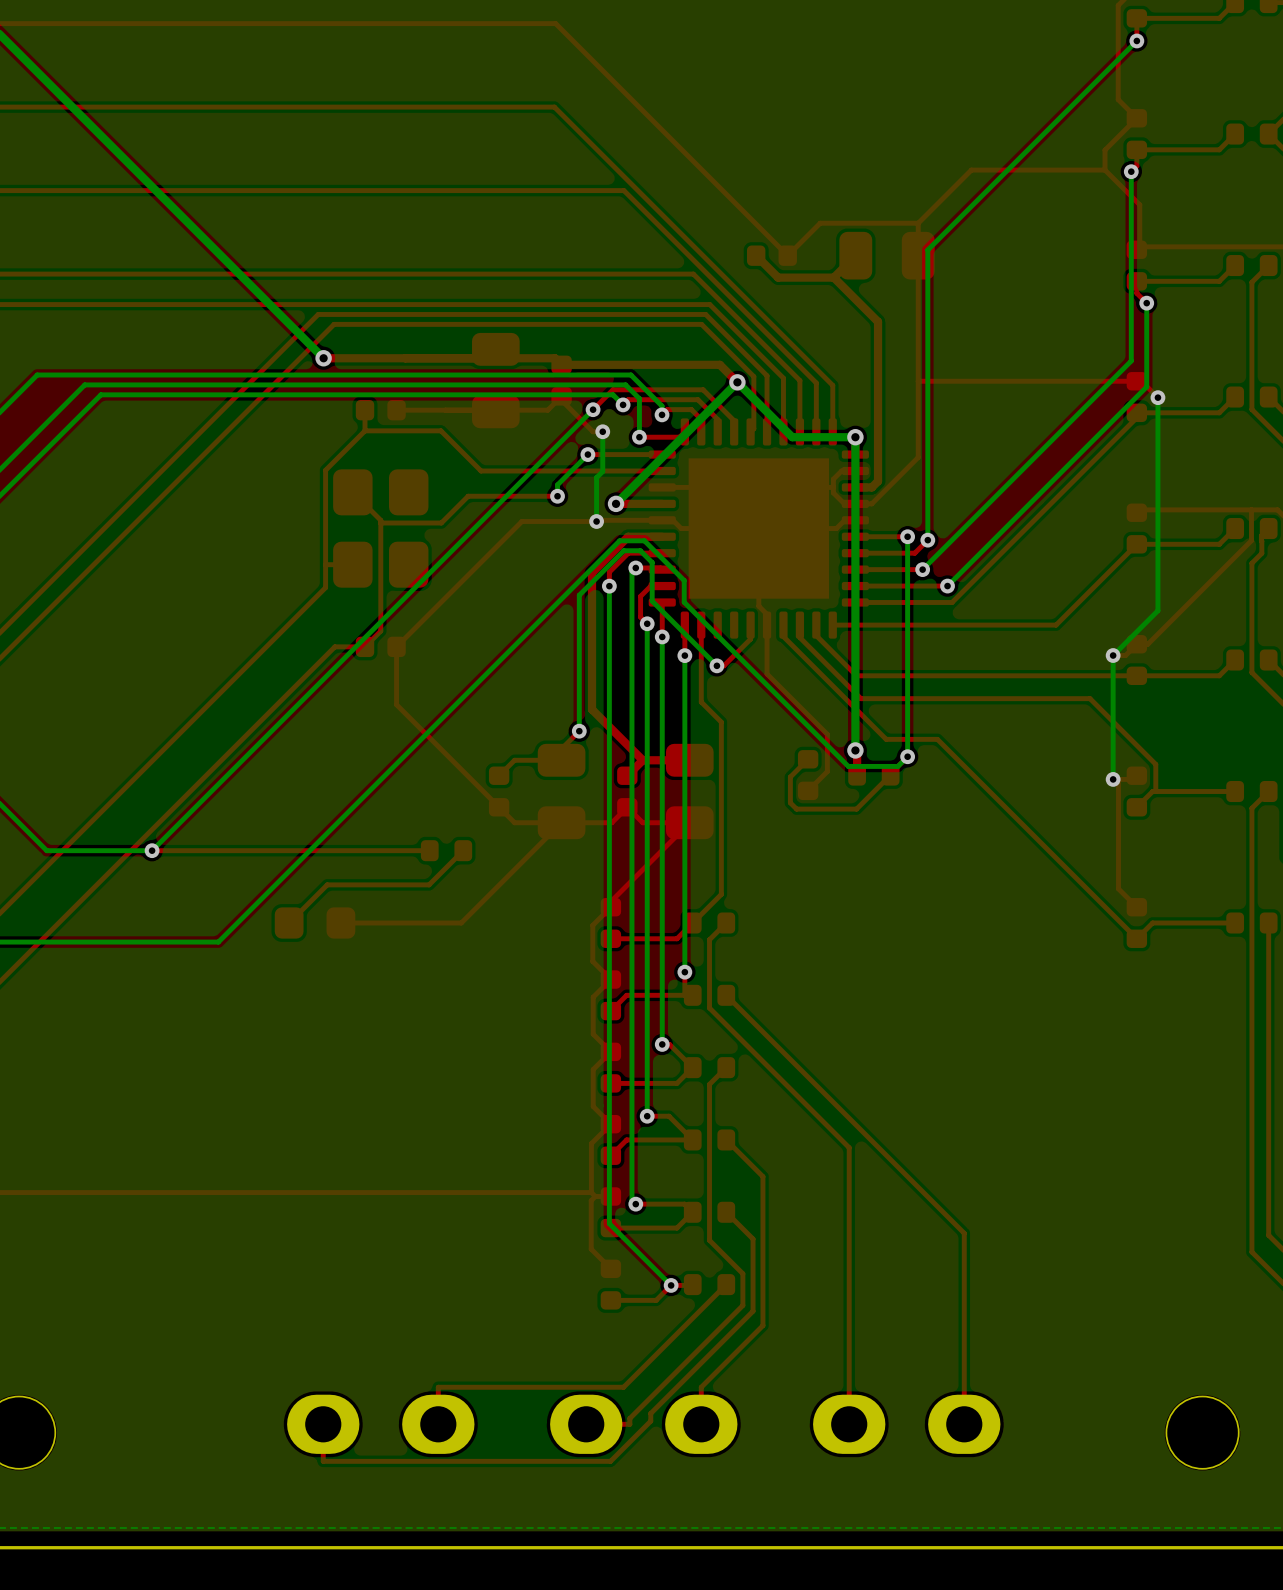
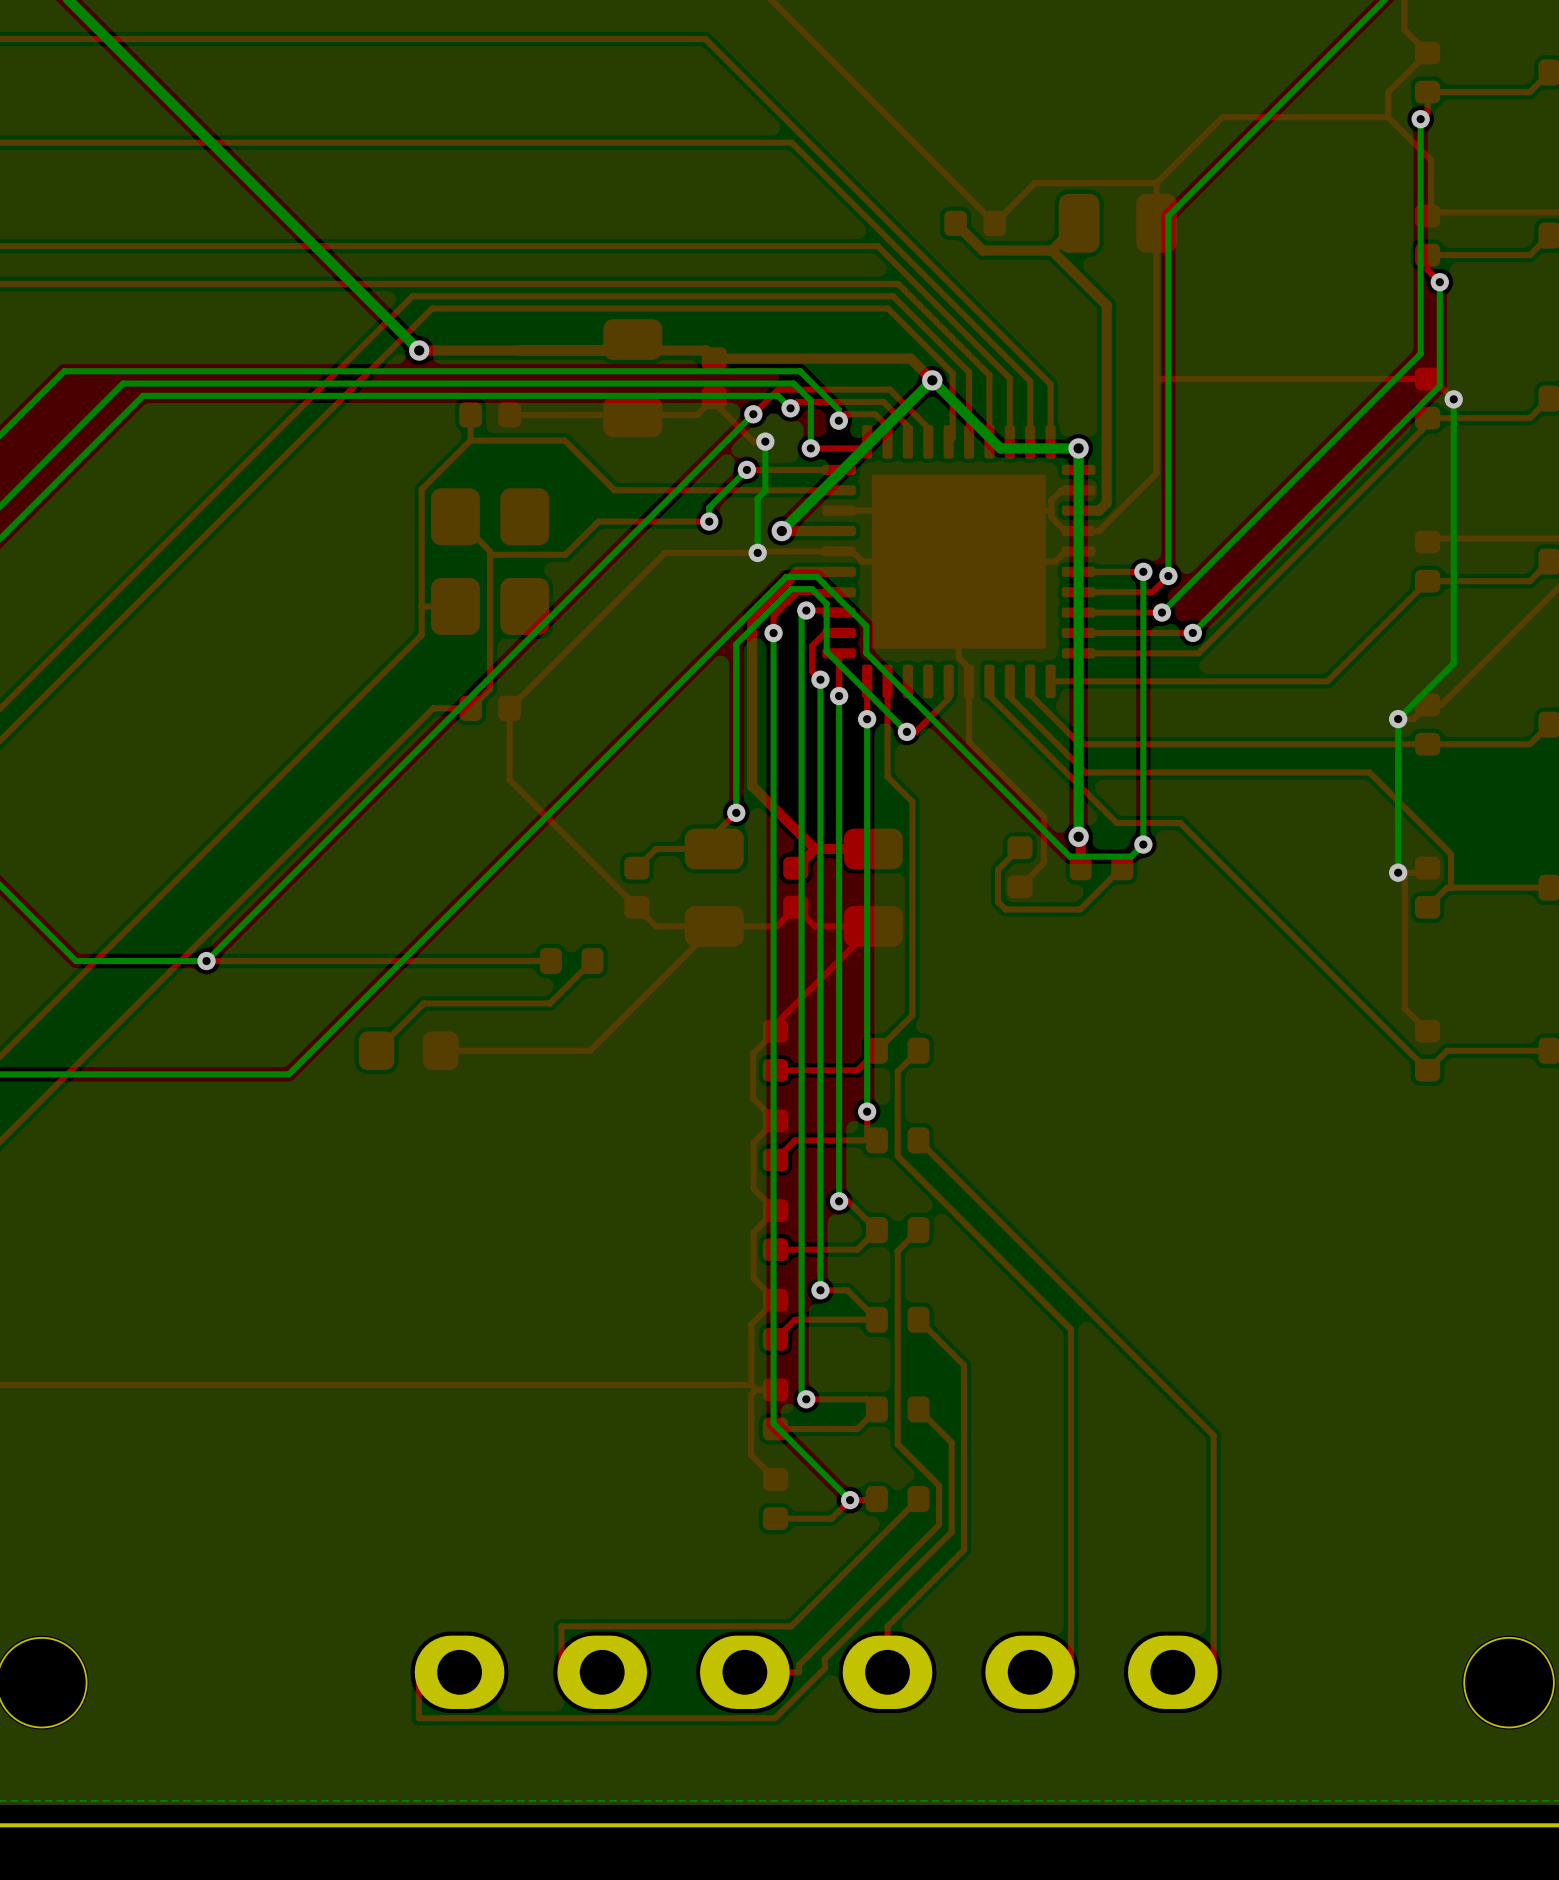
part position: (380, 1424) -> (530, 1672)
part position: (906, 1424) -> (1101, 1672)

